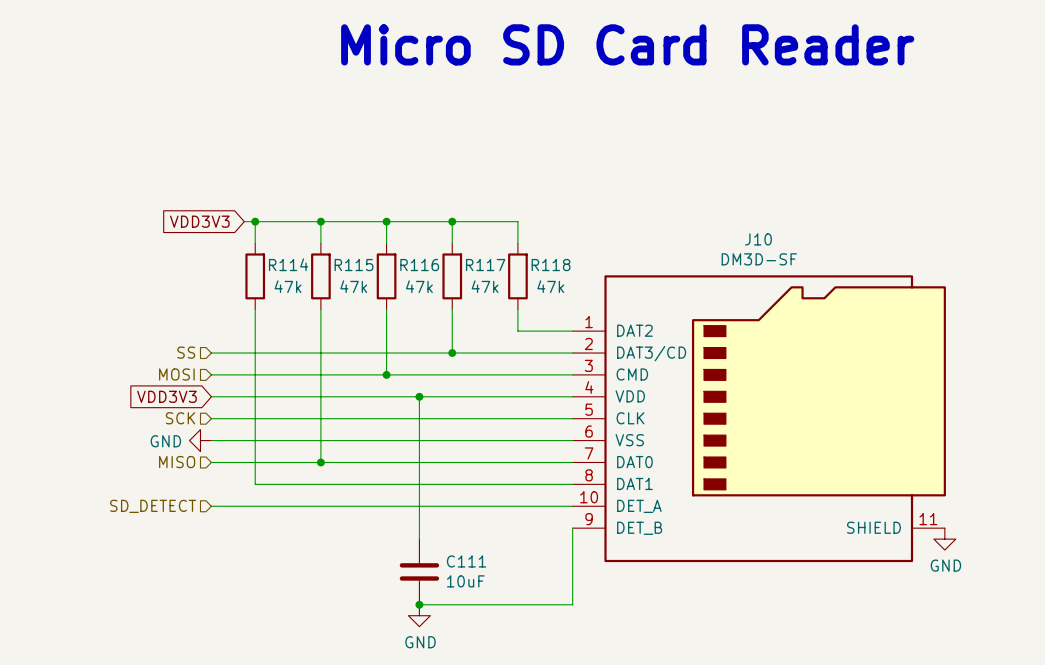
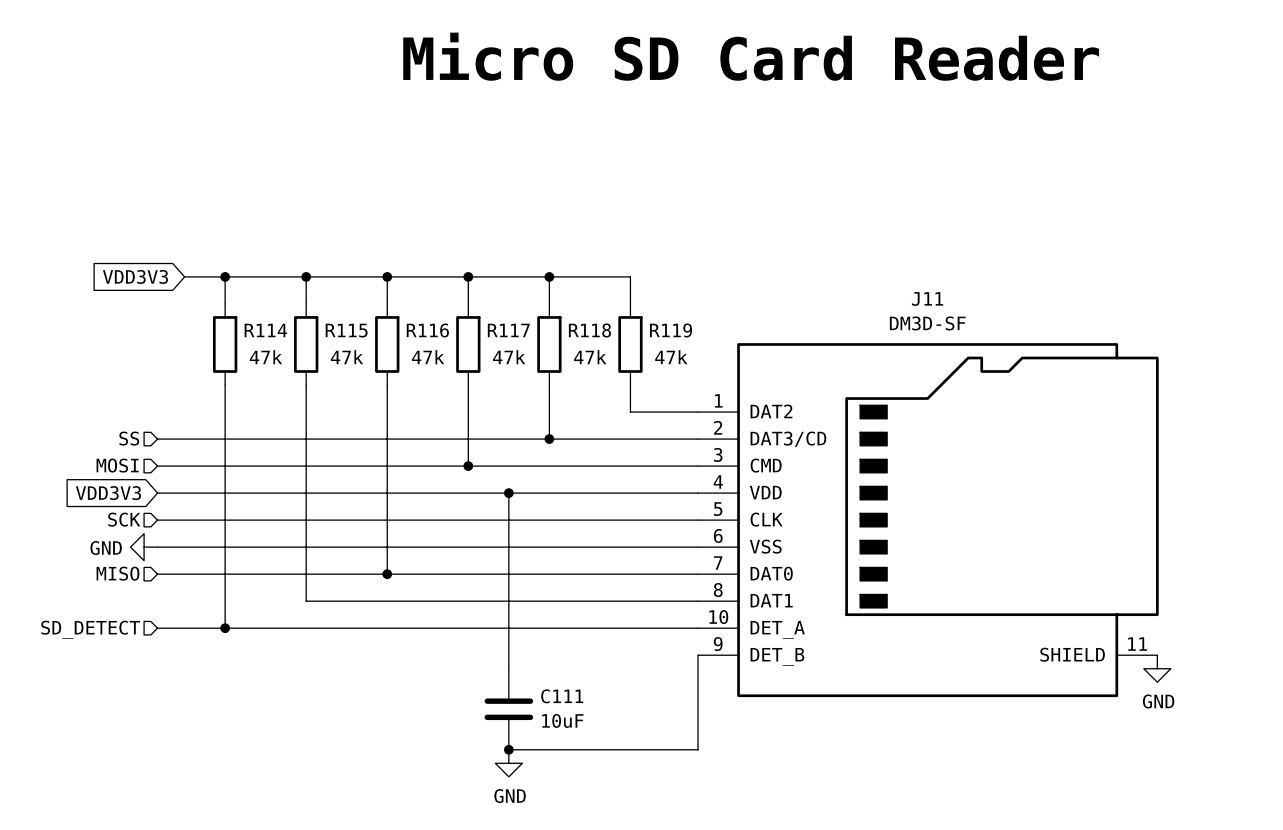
wire: none -> (184, 276) (292, 276)
wire: none -> (225, 276) (225, 303)
junction: none -> (225, 276)
global label position: VDD3V3 (199, 221) -> VDD3V3 (135, 276)
J10 name: J10 (758, 239) -> J11 (927, 298)
R114 name: R114 (288, 264) -> R115 (346, 330)
R115 name: R115 (354, 265) -> R116 (427, 330)
R116 name: R116 (419, 265) -> R117 (508, 330)
R117 name: R117 (485, 265) -> R118 (589, 330)
R118 name: R118 (551, 265) -> R119 (670, 330)
R114: none -> 47k (225, 344)
wire: none -> (225, 385) (225, 628)
hierarchical label position: SS (186, 352) -> SS (129, 438)
wire: none -> (157, 439) (252, 439)
wire: none -> (157, 466) (252, 466)
hierarchical label position: MOSI (176, 374) -> MOSI (117, 465)
wire: none -> (157, 493) (252, 493)
global label position: VDD3V3 (166, 396) -> VDD3V3 (108, 493)
wire: none -> (157, 520) (252, 520)
hierarchical label position: SCK (180, 418) -> SCK (124, 519)
wire: none -> (157, 547) (252, 547)
power symbol position: GND (200, 440) -> GND (144, 547)
wire: none -> (157, 574) (252, 574)
hierarchical label position: MISO (177, 462) -> MISO (117, 573)
wire: none -> (157, 628) (252, 628)
hierarchical label position: SD_DETECT (153, 506) -> SD_DETECT (90, 629)
junction: none -> (225, 628)

